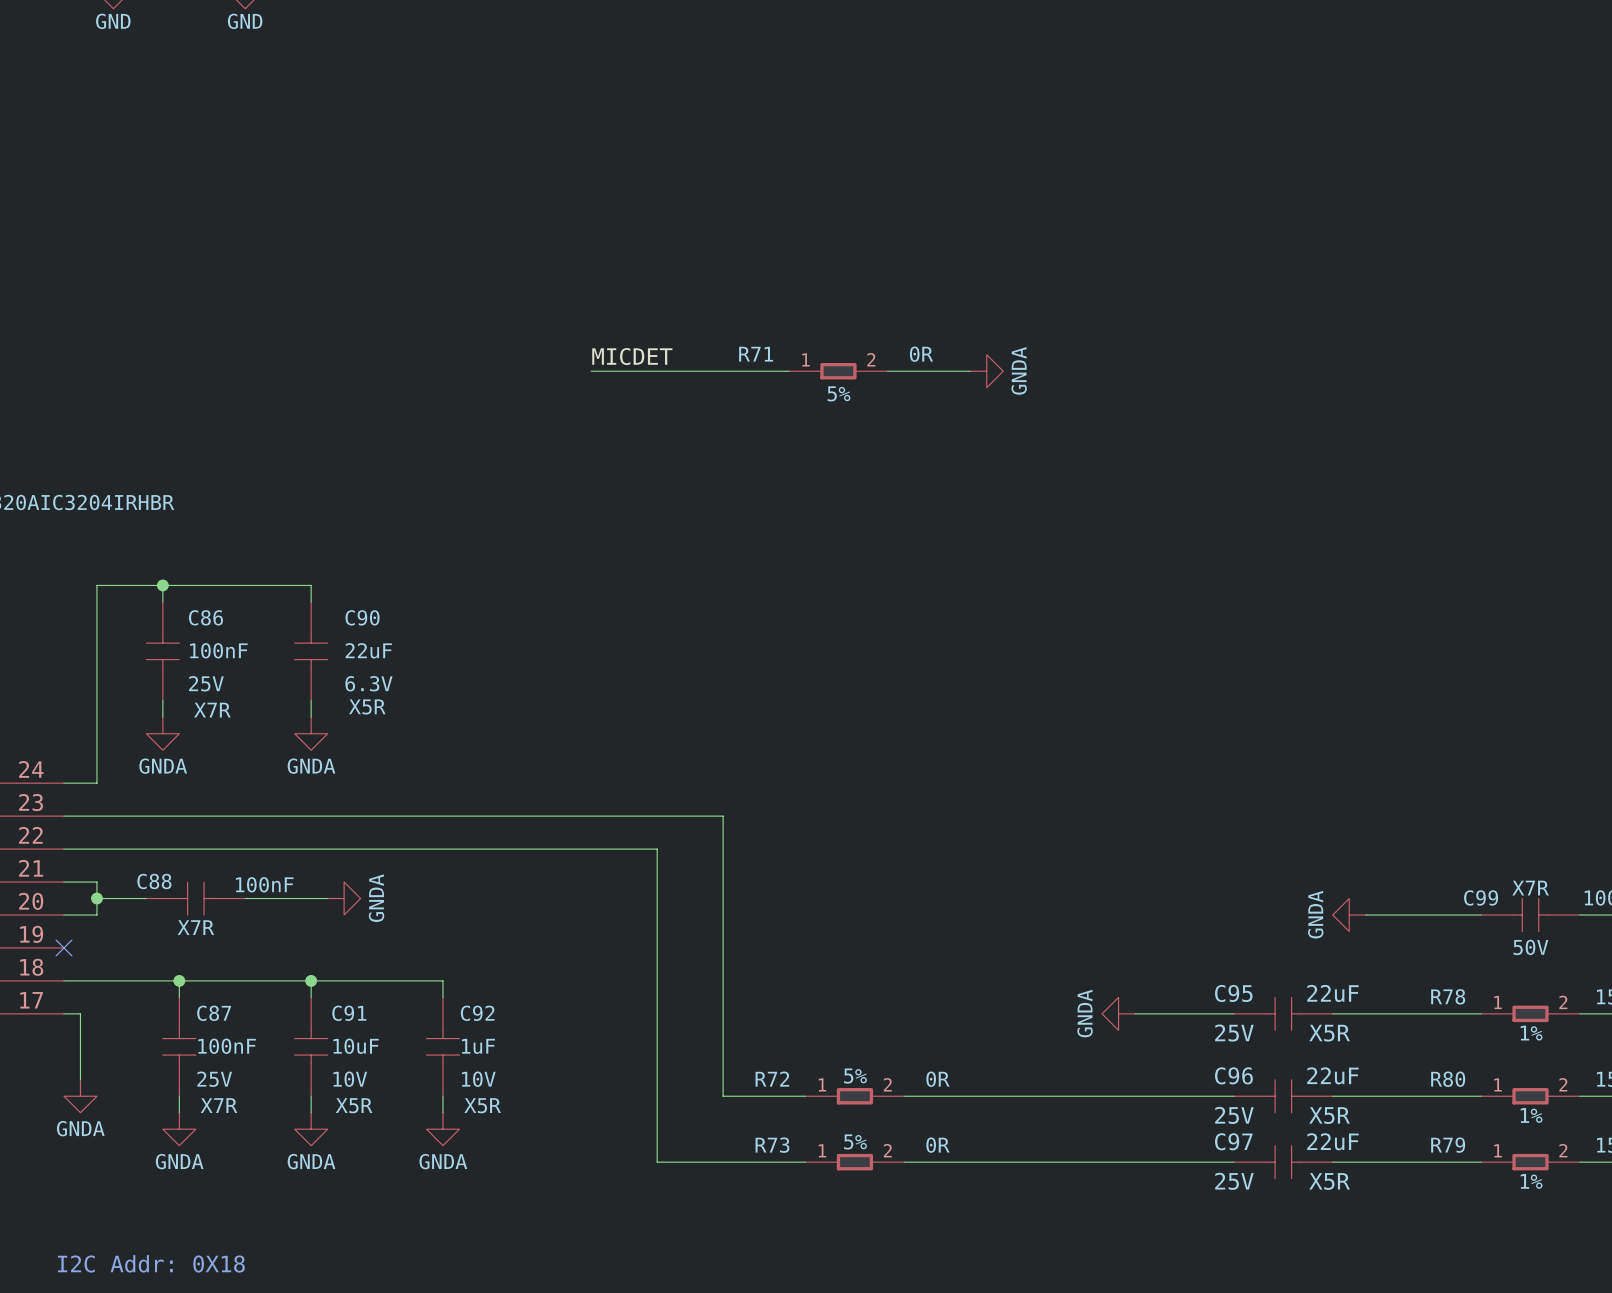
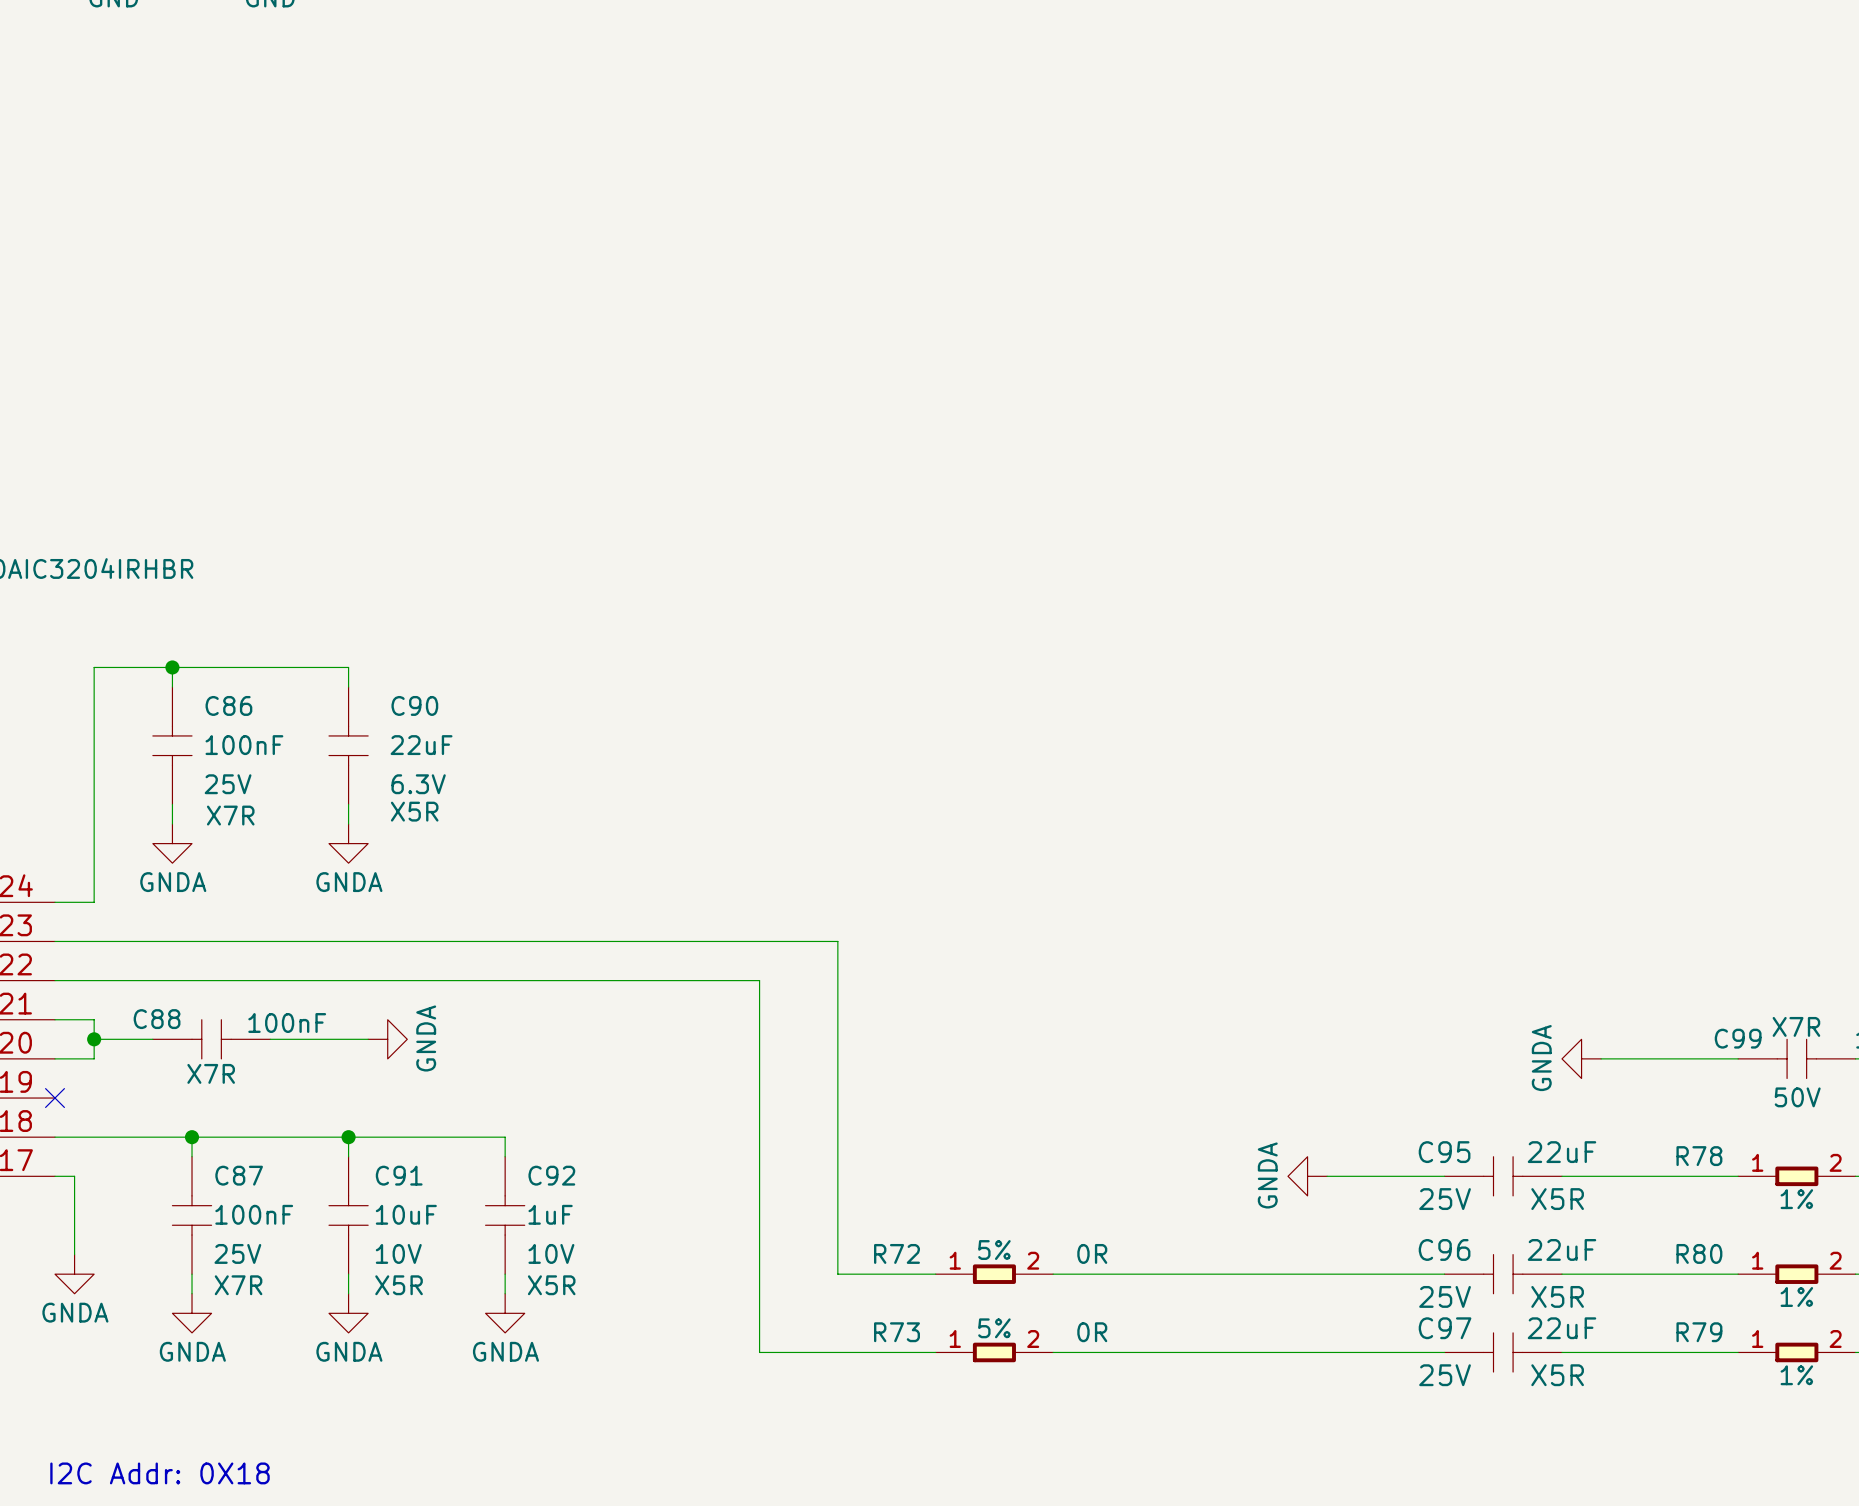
label: MICDET (632, 356) -> none
wire: (591, 371) (789, 371) -> none
R71: 0R (838, 371) -> none
wire: (887, 371) (970, 371) -> none
power symbol: GNDA (986, 371) -> none

